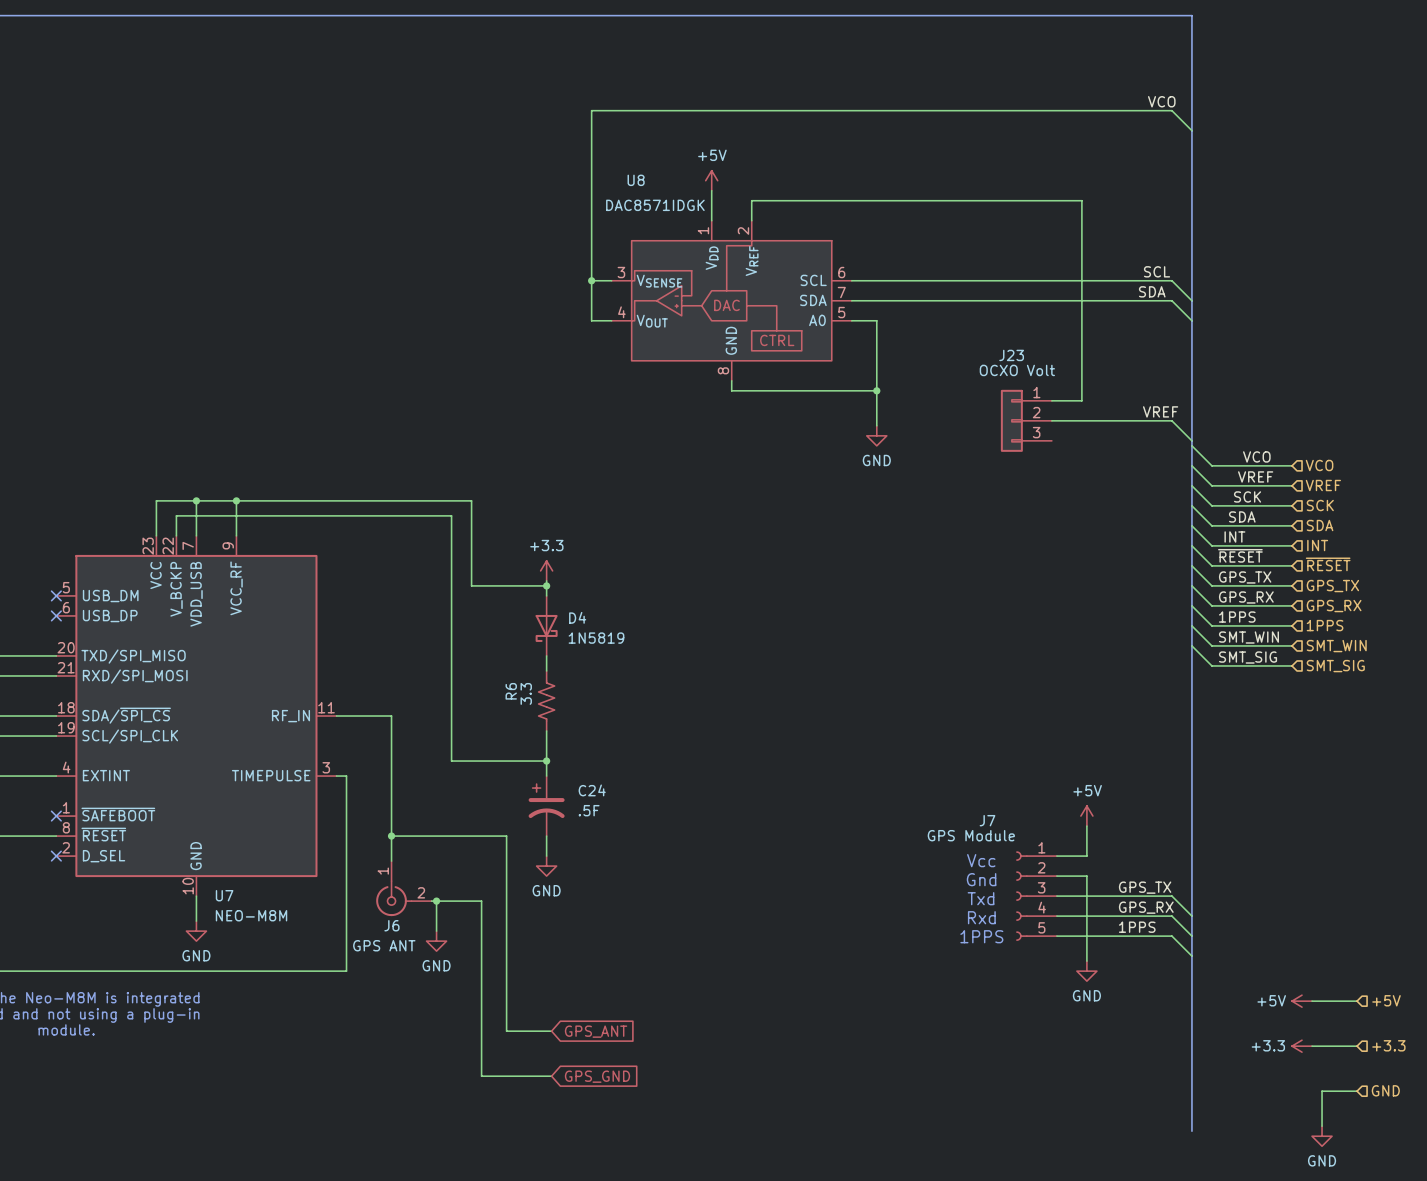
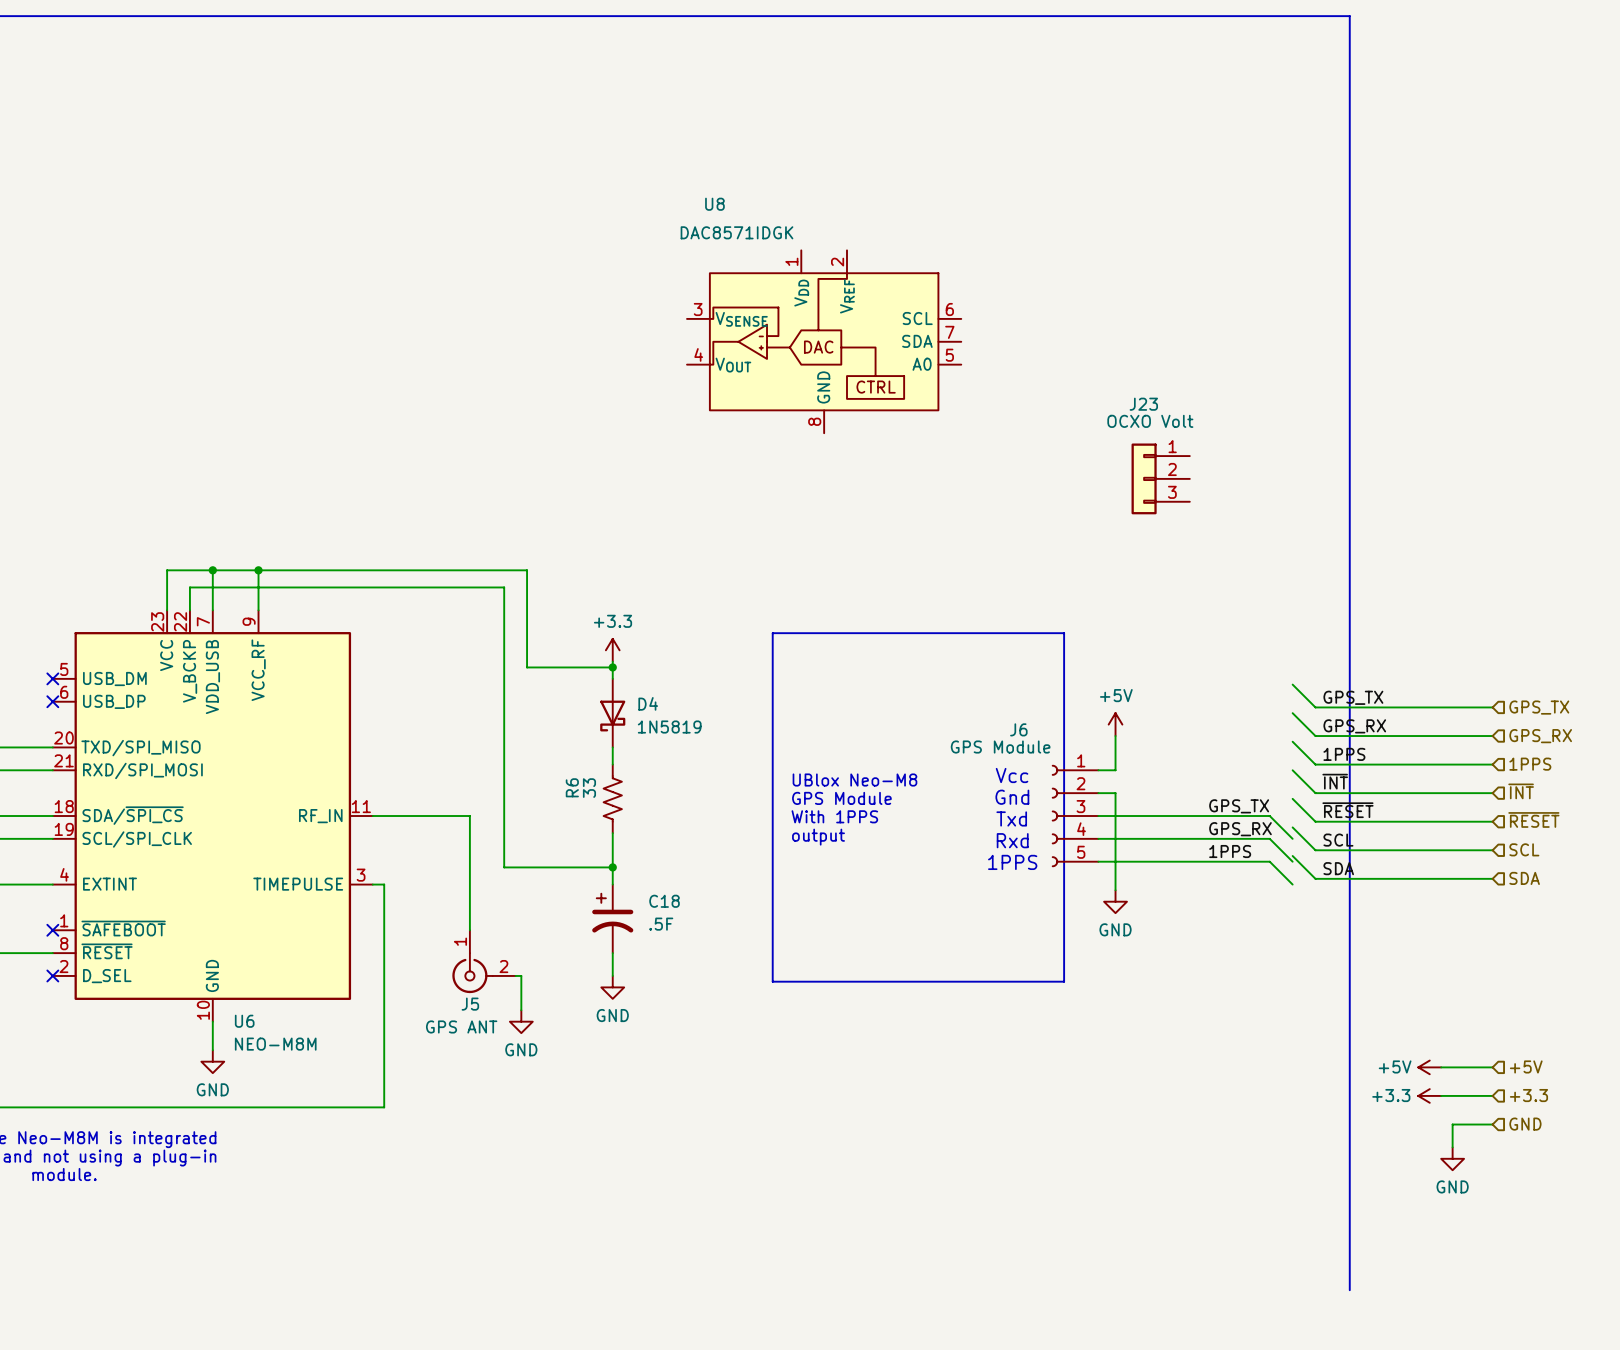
label: VCO (1161, 101) -> none
wire: (1191, 130) (1171, 110) (591, 110) (591, 320) (611, 320) -> none
power symbol: +5V (711, 180) -> none
wire: (711, 190) (711, 220) -> none
wire: (751, 220) (751, 200) (1081, 200) (1081, 400) (1051, 400) -> none
label: SCL (1157, 271) -> none
wire: (591, 280) (611, 280) -> none
junction: (591, 280) -> none
wire: (851, 280) (1171, 280) (1191, 300) -> none
label: SDA (1152, 291) -> none
wire: (851, 300) (1171, 300) (1191, 320) -> none
wire: (851, 320) (876, 320) (876, 425) -> none
wire: (731, 380) (731, 390) (876, 390) -> none
junction: (876, 390) -> none
label: VREF (1160, 411) -> none
wire: (1051, 420) (1171, 420) (1191, 440) -> none
power symbol: GND (876, 435) -> none
wire: (1191, 445) (1211, 465) (1292, 465) -> none
label: VCO (1256, 456) -> none
wire: (1191, 465) (1211, 485) (1292, 485) -> none
hierarchical label: VCO (1319, 465) -> none
label: VREF (1255, 476) -> none
wire: (1191, 485) (1211, 505) (1292, 505) -> none
hierarchical label: VREF (1323, 485) -> none
label: SCK (1247, 496) -> none
wire: (1191, 505) (1211, 525) (1292, 525) -> none
hierarchical label: SCK (1320, 505) -> none
label: SDA (1242, 516) -> none
wire: (1191, 525) (1211, 545) (1292, 545) -> none
hierarchical label: SDA (1320, 525) -> none
label: INT (1234, 536) -> none
wire: (1191, 545) (1211, 565) (1292, 565) -> none
hierarchical label: INT (1317, 545) -> none
line: none -> (772, 633) (1064, 633) (1064, 981) (772, 981) (772, 633)
label position: ~{RESET} (1240, 555) -> ~{RESET} (1347, 810)
hierarchical label position: ~{RESET} (1328, 564) -> ~{RESET} (1533, 819)
wire: (1191, 565) (1211, 585) (1292, 585) -> none
label position: GPS_TX (1245, 577) -> GPS_TX (1353, 697)
wire: (1191, 585) (1211, 605) (1292, 605) -> none
hierarchical label position: GPS_TX (1332, 586) -> GPS_TX (1539, 707)
label position: GPS_RX (1246, 597) -> GPS_RX (1354, 726)
wire: none -> (1292, 684) (1315, 707) (1492, 707)
wire: (1191, 605) (1211, 625) (1292, 625) -> none
hierarchical label position: GPS_RX (1334, 606) -> GPS_RX (1540, 736)
label position: 1PPS (1237, 617) -> 1PPS (1344, 754)
wire: (1191, 625) (1211, 645) -> (1292, 713) (1315, 736) (1372, 736)
hierarchical label position: 1PPS (1325, 625) -> 1PPS (1530, 764)
power symbol: none -> +5V (1115, 724)
label: SMT_WIN (1248, 637) -> none
wire: none -> (1115, 736) (1115, 770) (1098, 770)
wire: (1191, 645) (1211, 665) (1292, 665) -> none
wire: none -> (1464, 736) (1492, 736)
hierarchical label: SMT_WIN (1336, 646) -> none
wire: none -> (1292, 741) (1315, 764) (1492, 764)
label: SMT_SIG (1248, 657) -> none
hierarchical label: SMT_SIG (1335, 666) -> none
wire: none -> (1292, 770) (1315, 793) (1492, 793)
text: none -> Vcc (1012, 775)
text: none -> UBlox Neo-M8 (854, 780)
label: none -> ~{INT} (1335, 781)
R6 value: 3.3 (526, 693) -> 33 (589, 788)
hierarchical label: none -> ~{INT} (1521, 791)
wire: none -> (1098, 793) (1115, 793) (1115, 890)
text: none -> Gnd (1012, 797)
text: none -> GPS Module (841, 798)
wire: none -> (1292, 798) (1315, 821) (1492, 821)
label: none -> GPS_TX (1239, 806)
wire: (391, 716) (391, 861) -> (435, 816) (469, 816) (469, 930)
text: none -> With 1PPS (834, 816)
wire: none -> (1098, 816) (1269, 816) (1292, 838)
text: none -> Txd (1011, 818)
wire: none -> (1292, 827) (1315, 850) (1492, 850)
label: none -> GPS_RX (1240, 829)
text: none -> output (818, 837)
wire: none -> (1098, 838) (1269, 838) (1292, 861)
text: none -> Rxd (1012, 840)
label: none -> SCL (1338, 840)
hierarchical label: none -> SCL (1524, 849)
label: none -> 1PPS (1230, 851)
wire: none -> (1292, 855) (1315, 878) (1492, 878)
text: none -> 1PPS (1012, 862)
wire: none -> (1098, 861) (1269, 861) (1292, 884)
label: none -> SDA (1338, 868)
hierarchical label: none -> SDA (1524, 878)
C24 name: C24 (592, 790) -> C18 (664, 901)
power symbol: none -> GND (1115, 901)
power symbol: +5V (1086, 816) -> none
wire: (1086, 826) (1086, 856) (1056, 856) -> none
wire: (391, 836) (506, 836) (506, 1031) (551, 1031) -> none
junction: (391, 836) -> none
J5: none -> GPS ANT (483, 961)
wire: none -> (515, 975) (521, 975) (521, 1010)
text: Vcc (981, 860) -> none
J6 symbol: [376, 861, 432, 917] -> [1051, 765, 1099, 867]
wire: (1056, 876) (1086, 876) (1086, 961) -> none
text: Gnd (981, 879) -> none
label: GPS_TX (1145, 887) -> none
U7 name: U7 (224, 895) -> U6 (244, 1021)
J7: GPS Module (1036, 896) -> none
wire: (1056, 896) (1171, 896) (1191, 916) -> none
text: Txd (981, 898) -> none
wire: (431, 901) (481, 901) (481, 1076) (551, 1076) -> none
wire: (436, 901) (436, 931) -> none
junction: (436, 901) -> none
label: GPS_RX (1146, 907) -> none
wire: (1056, 916) (1171, 916) (1191, 936) -> none
text: Rxd (981, 917) -> none
J6 name position: J6 (391, 925) -> J6 (1018, 729)
label: 1PPS (1137, 927) -> none
text: 1PPS (981, 936) -> none
wire: (1056, 936) (1171, 936) (1191, 956) -> none
power symbol position: GND (436, 941) -> GND (521, 1021)
J6 value: GPS ANT (384, 945) -> GPS Module (1000, 747)
power symbol: GND (1086, 971) -> none
wire: none -> (1492, 1124) (1452, 1124) (1452, 1147)
hierarchical label position: +5V (1386, 1000) -> +5V (1526, 1066)
power symbol position: +5V (1302, 1001) -> +5V (1429, 1067)
wire: (1312, 1001) (1357, 1001) -> (1441, 1095) (1492, 1095)
power symbol: none -> GND (1452, 1158)
global label: GPS_ANT (596, 1031) -> none
hierarchical label position: +3.3 (1388, 1045) -> +3.3 (1528, 1095)
power symbol position: +3.3 (1302, 1046) -> +3.3 (1429, 1095)
wire: (1312, 1046) (1357, 1046) -> (1441, 1067) (1492, 1067)
global label: GPS_GND (597, 1076) -> none
hierarchical label position: GND (1385, 1090) -> GND (1525, 1124)
wire: (1357, 1091) (1322, 1091) (1322, 1126) -> none
power symbol: GND (1322, 1136) -> none

